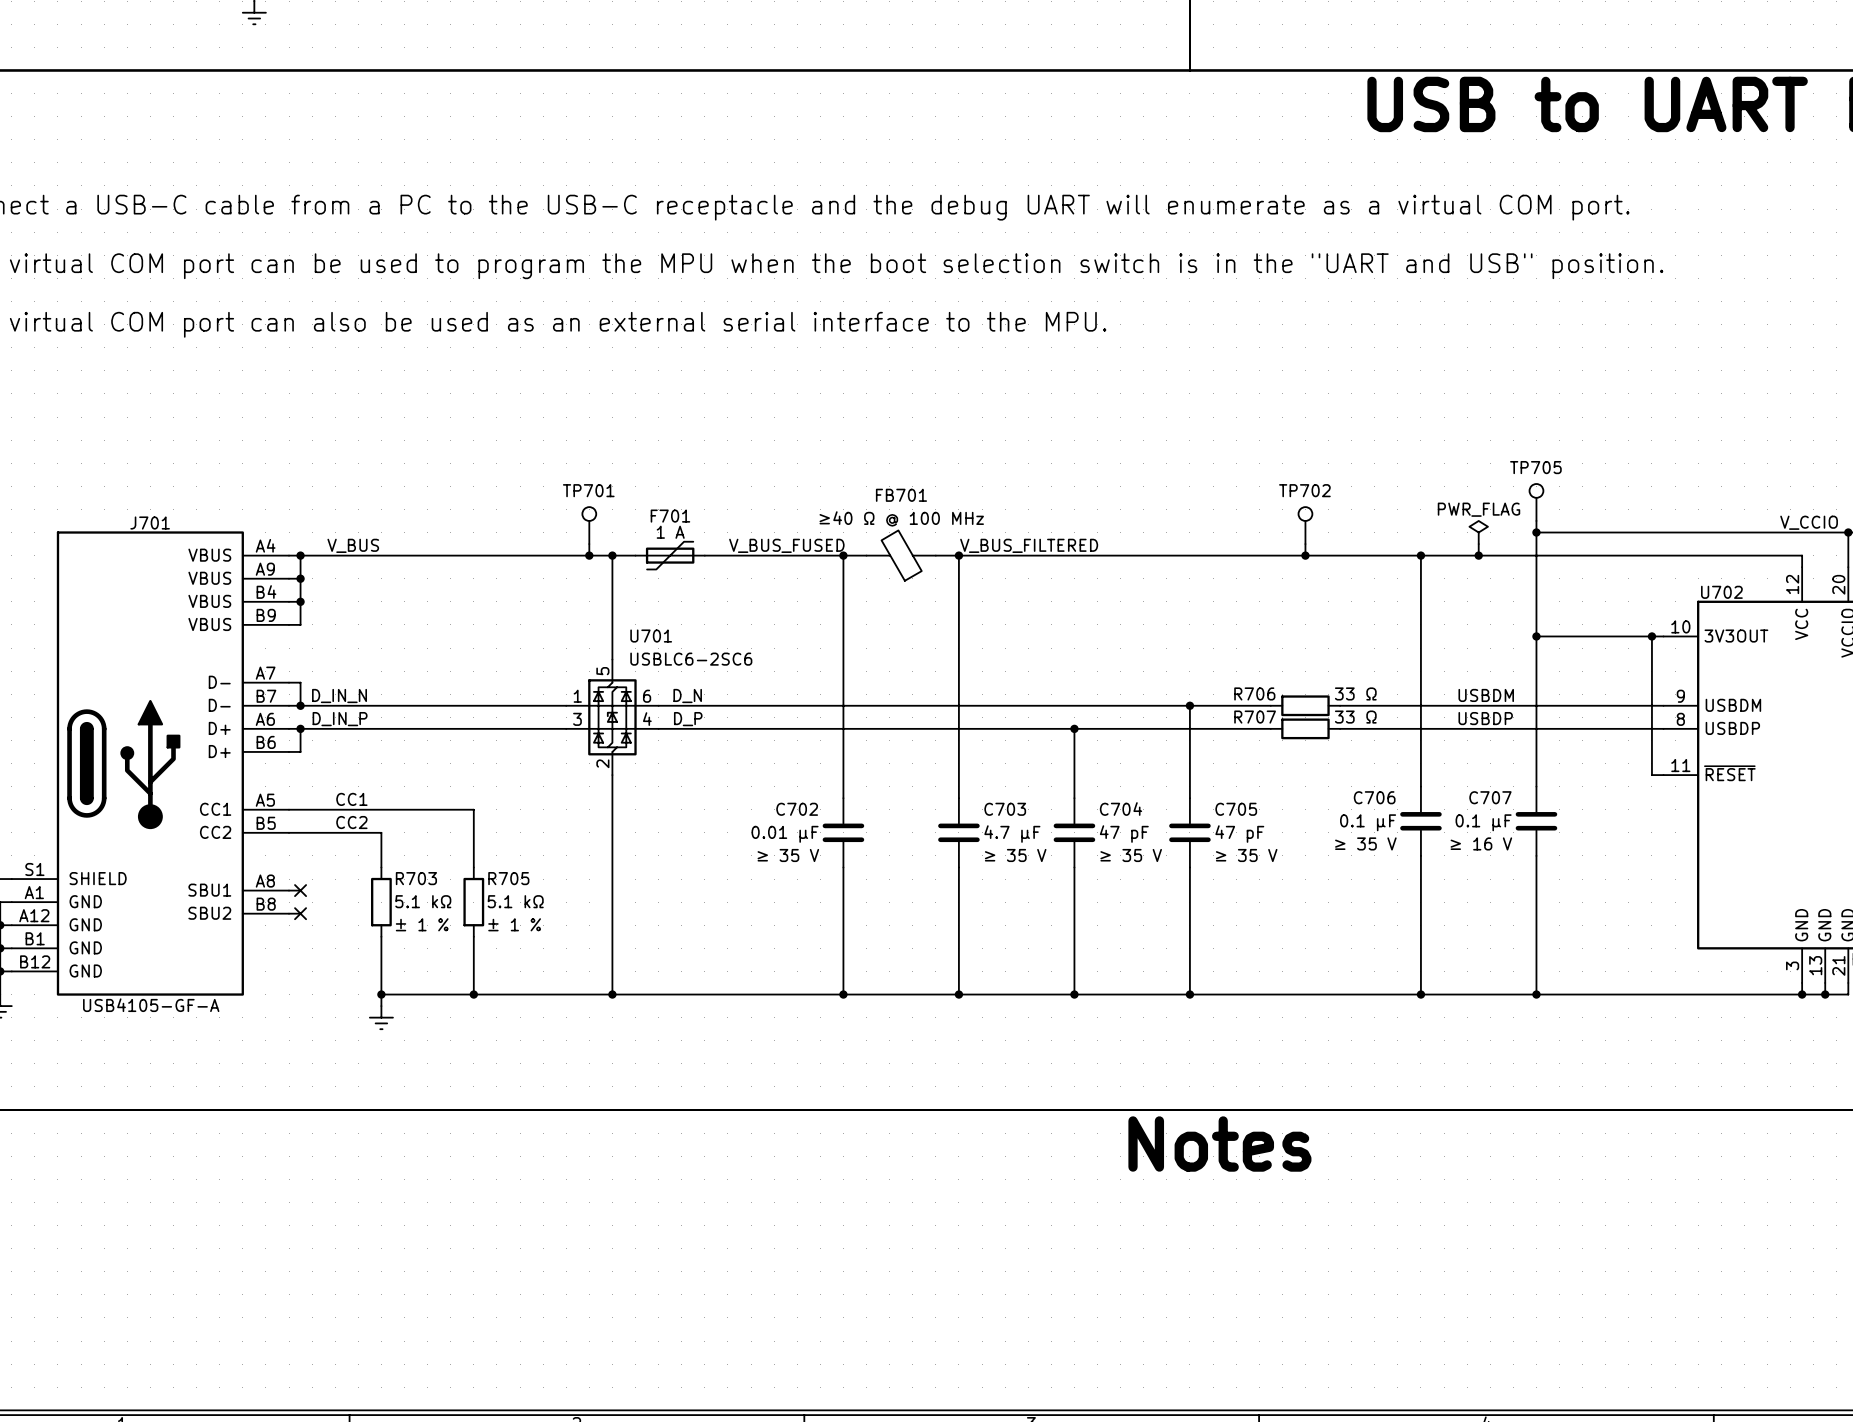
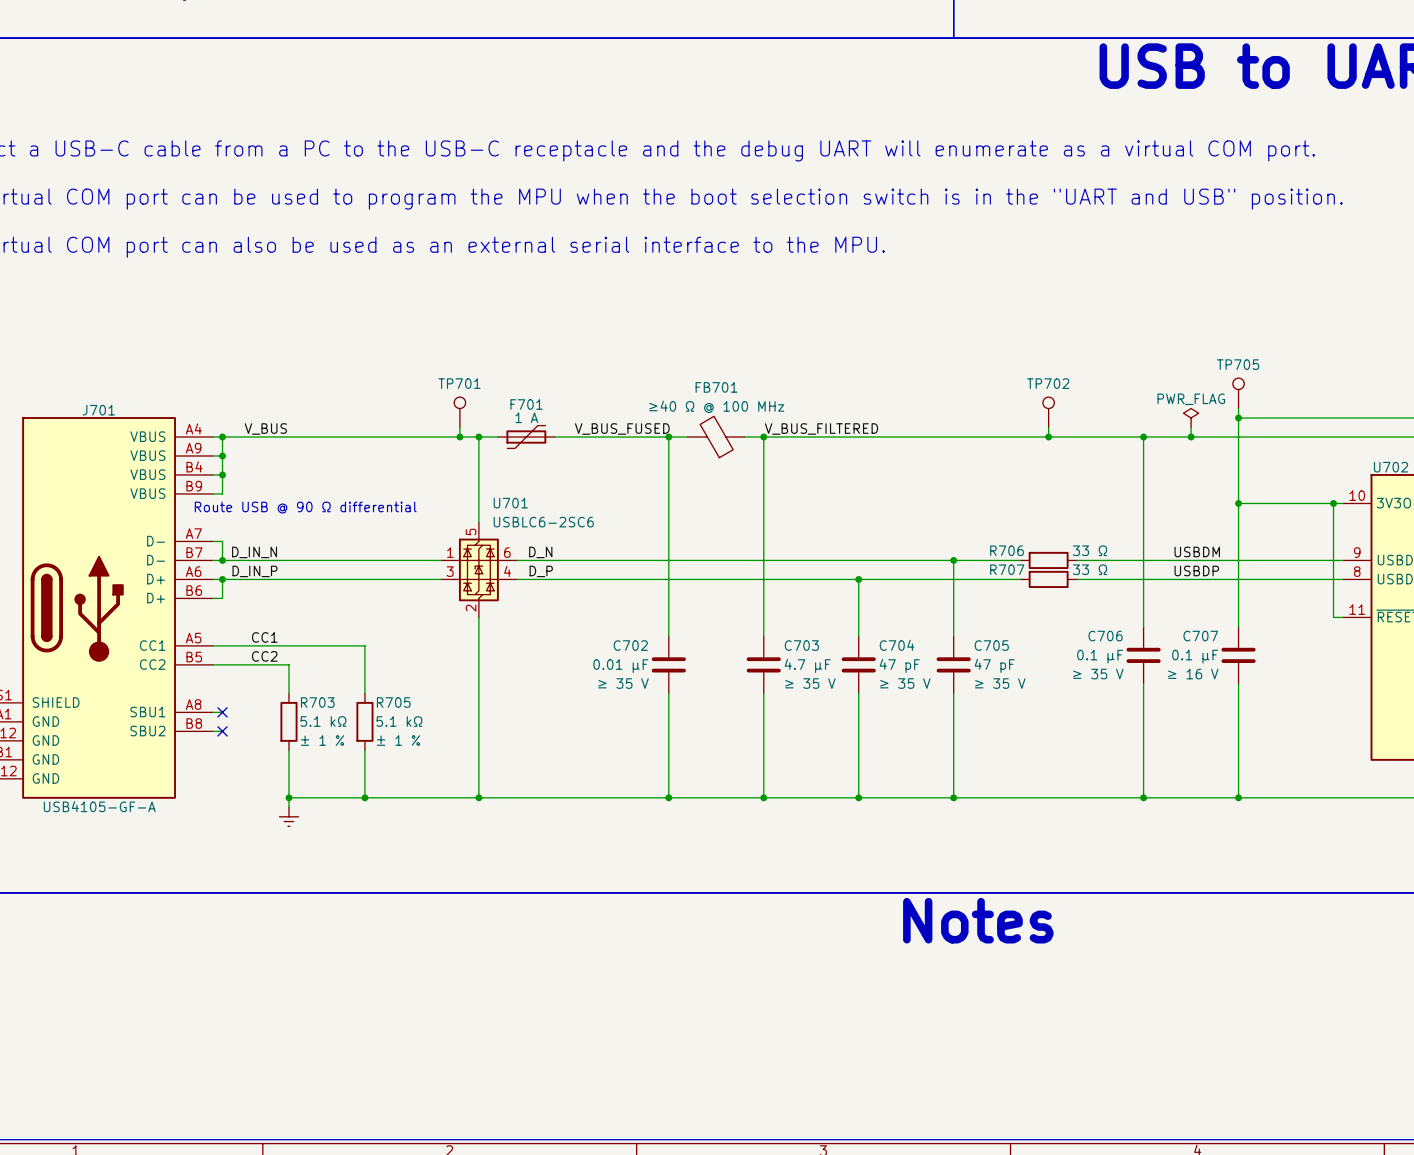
text: none -> Route USB @ 90 Ω differential (305, 507)

